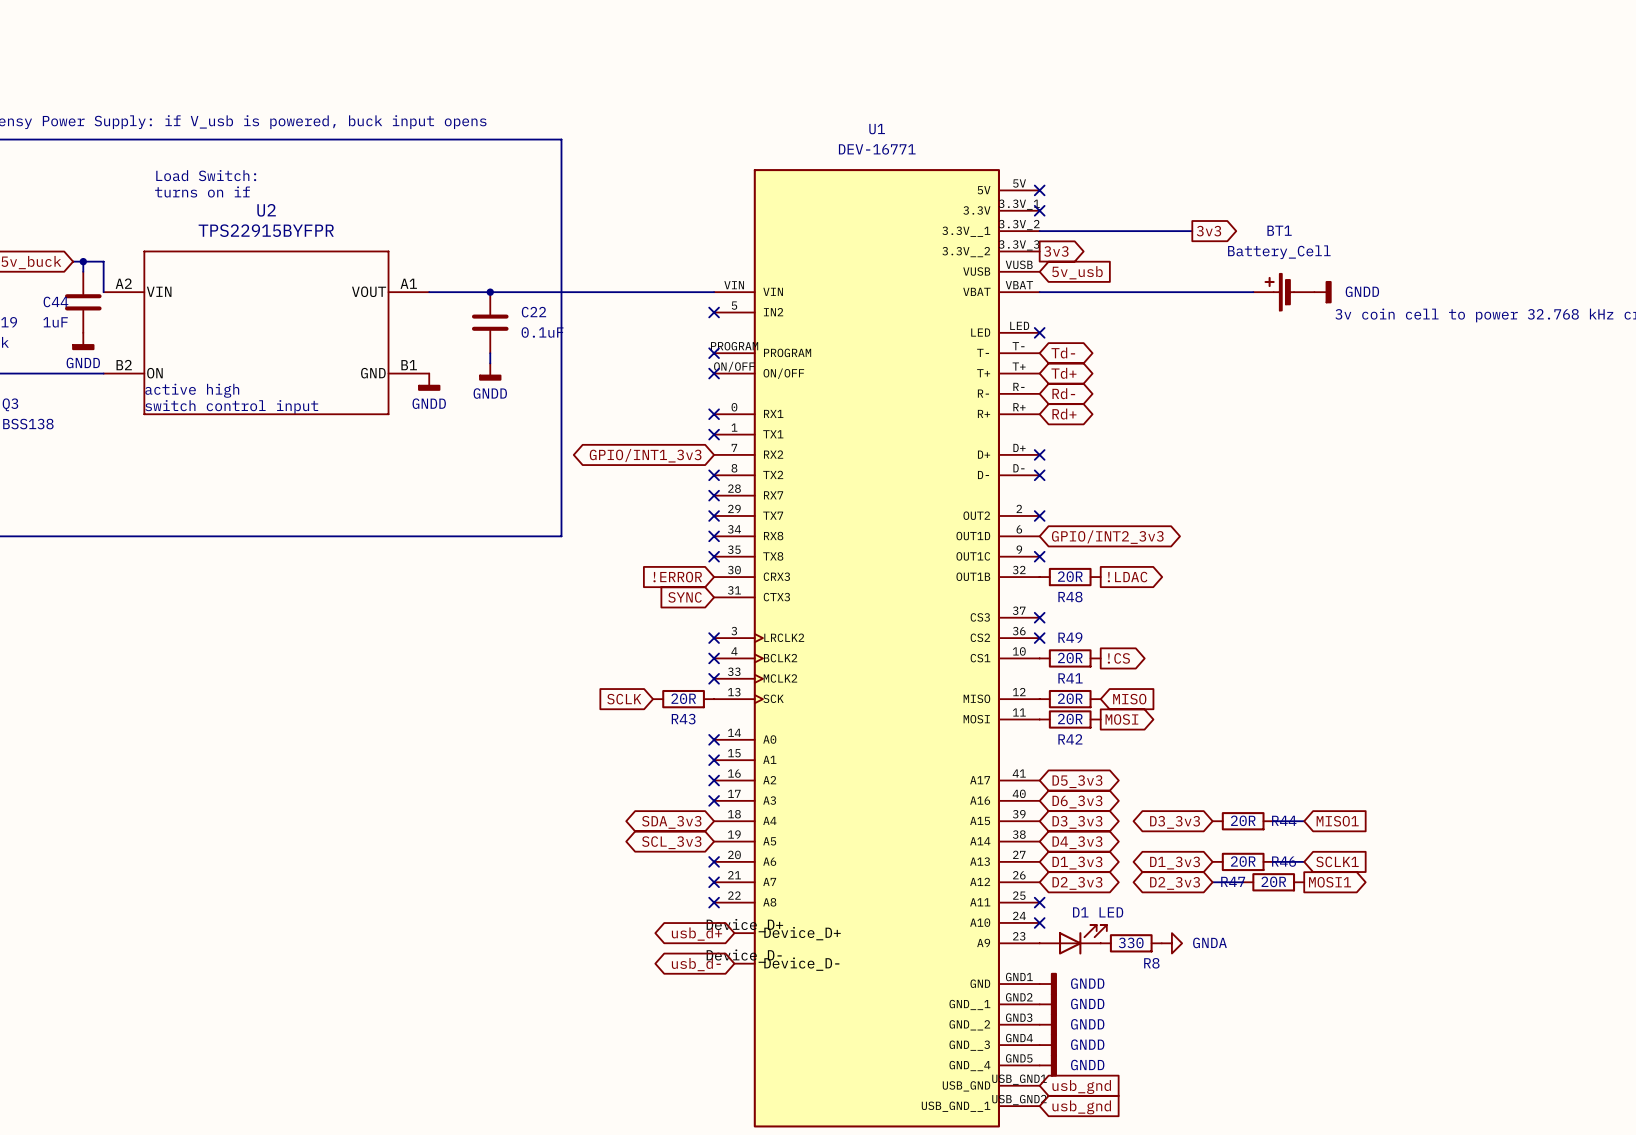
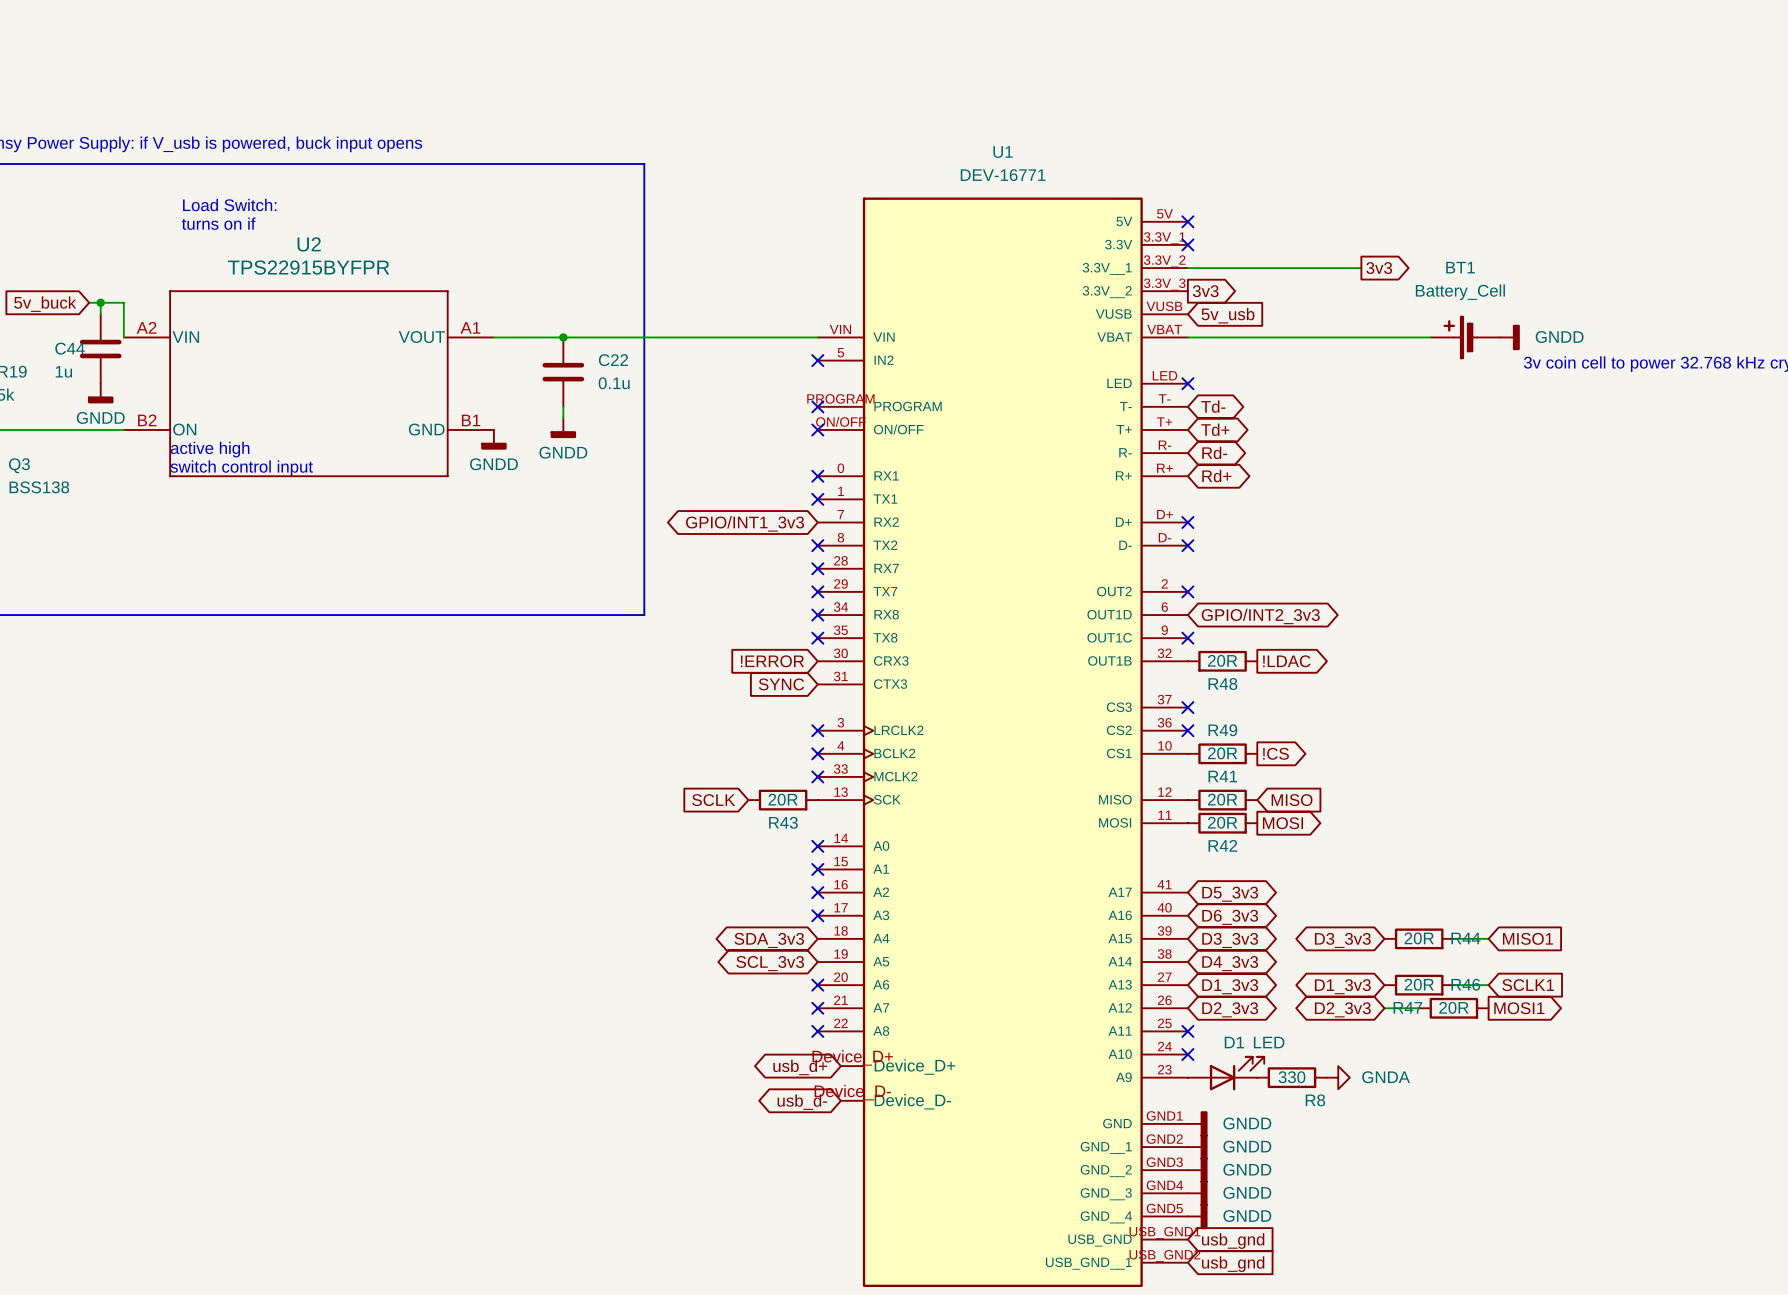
C44 value: 1uF (55, 322) -> 1u (63, 371)
C22 value: 0.1uF (542, 332) -> 0.1u (614, 383)

